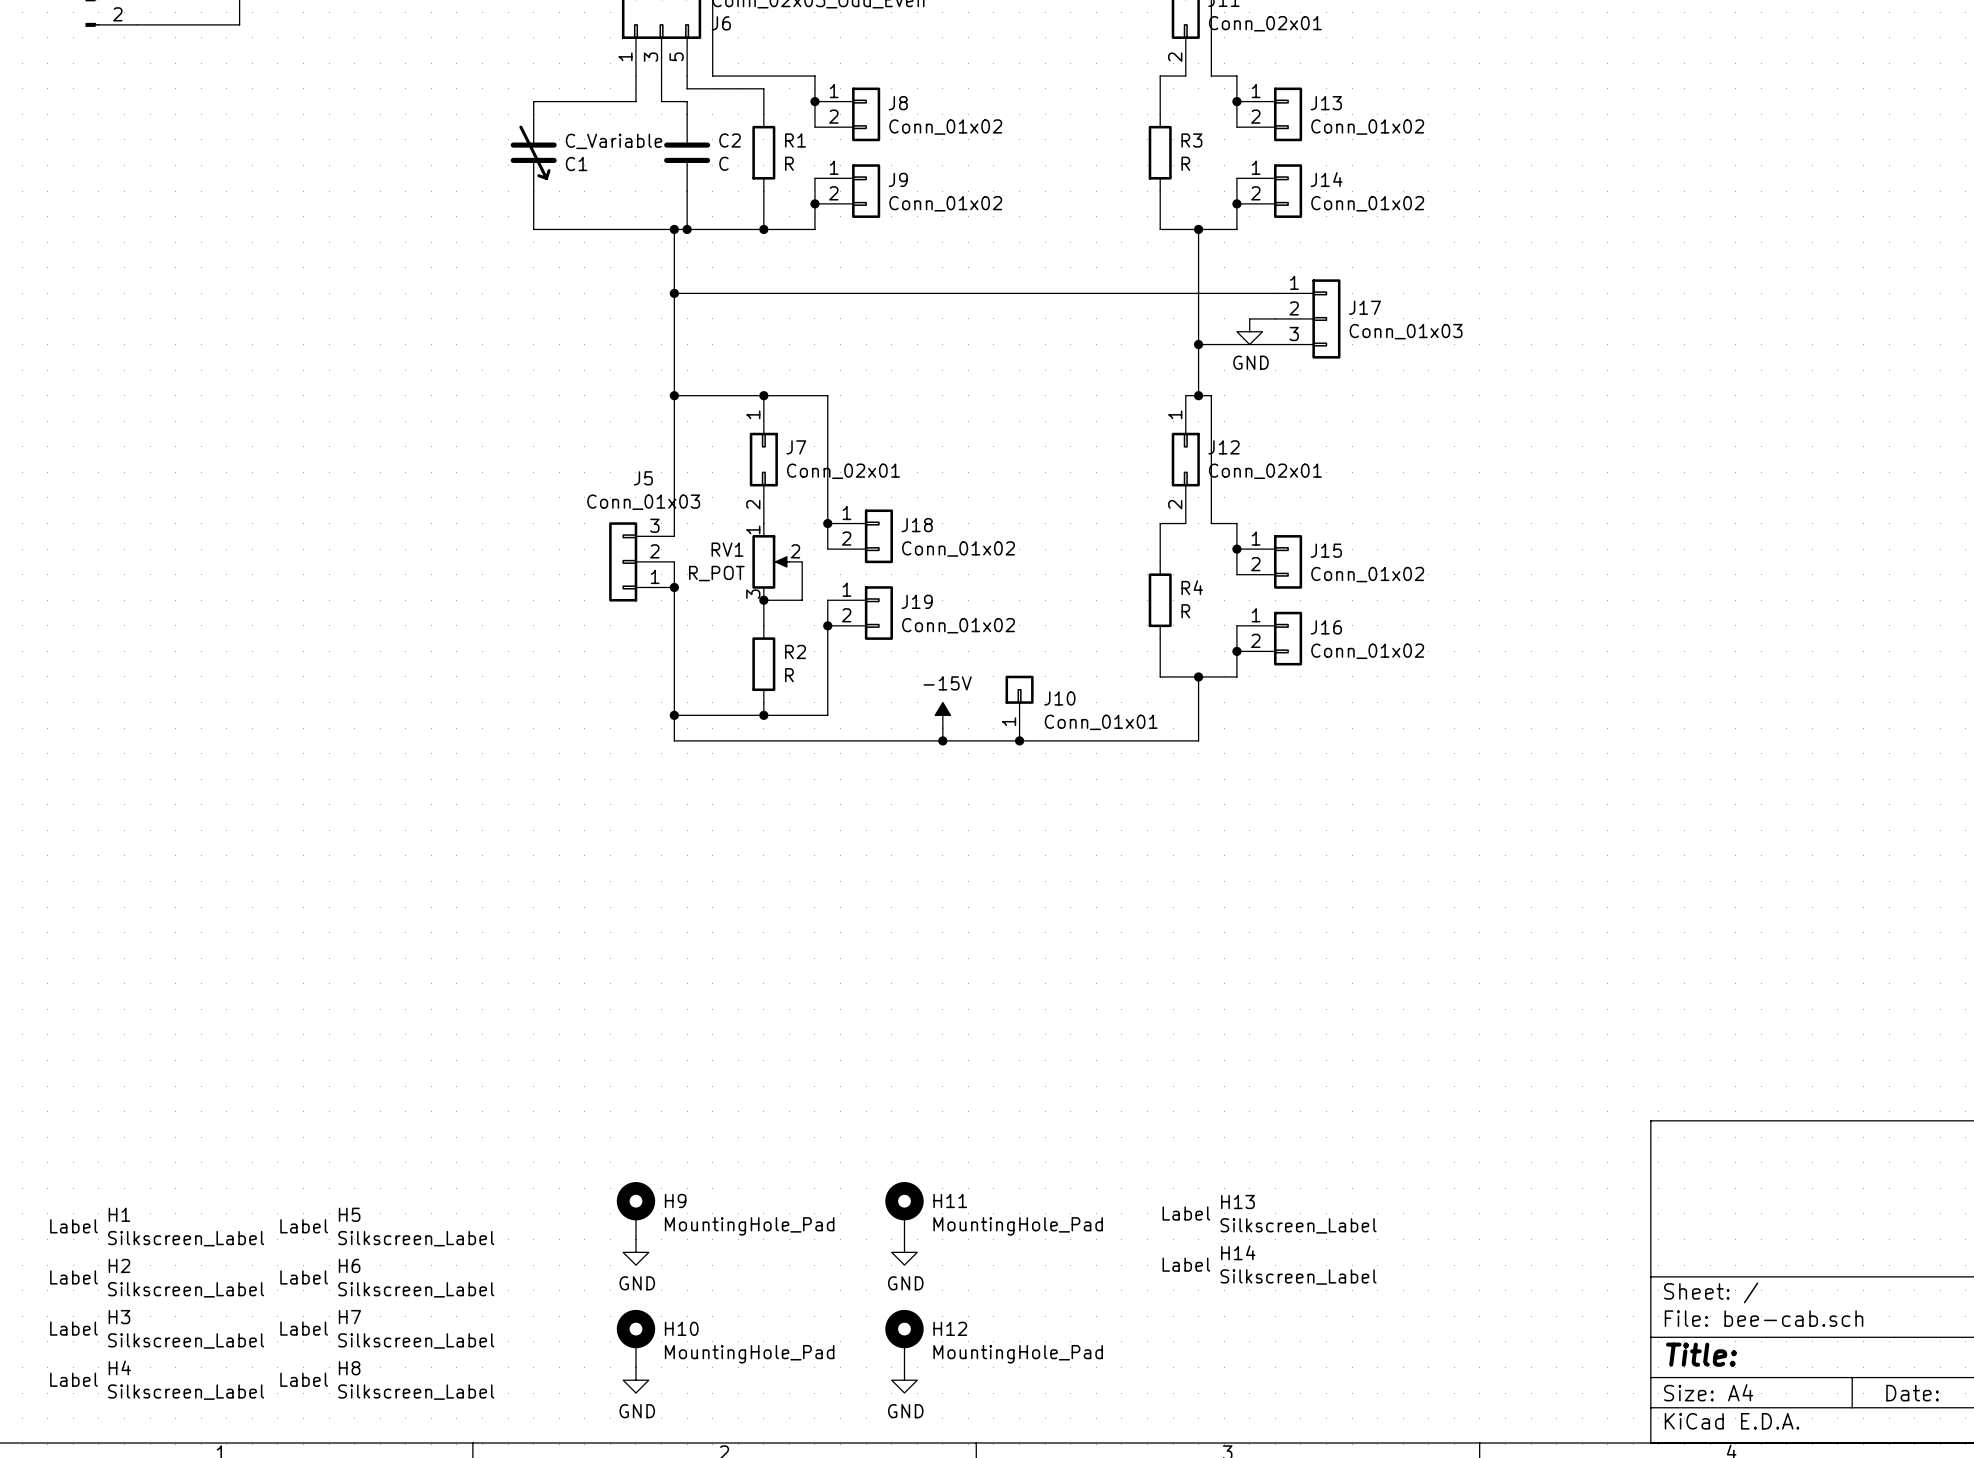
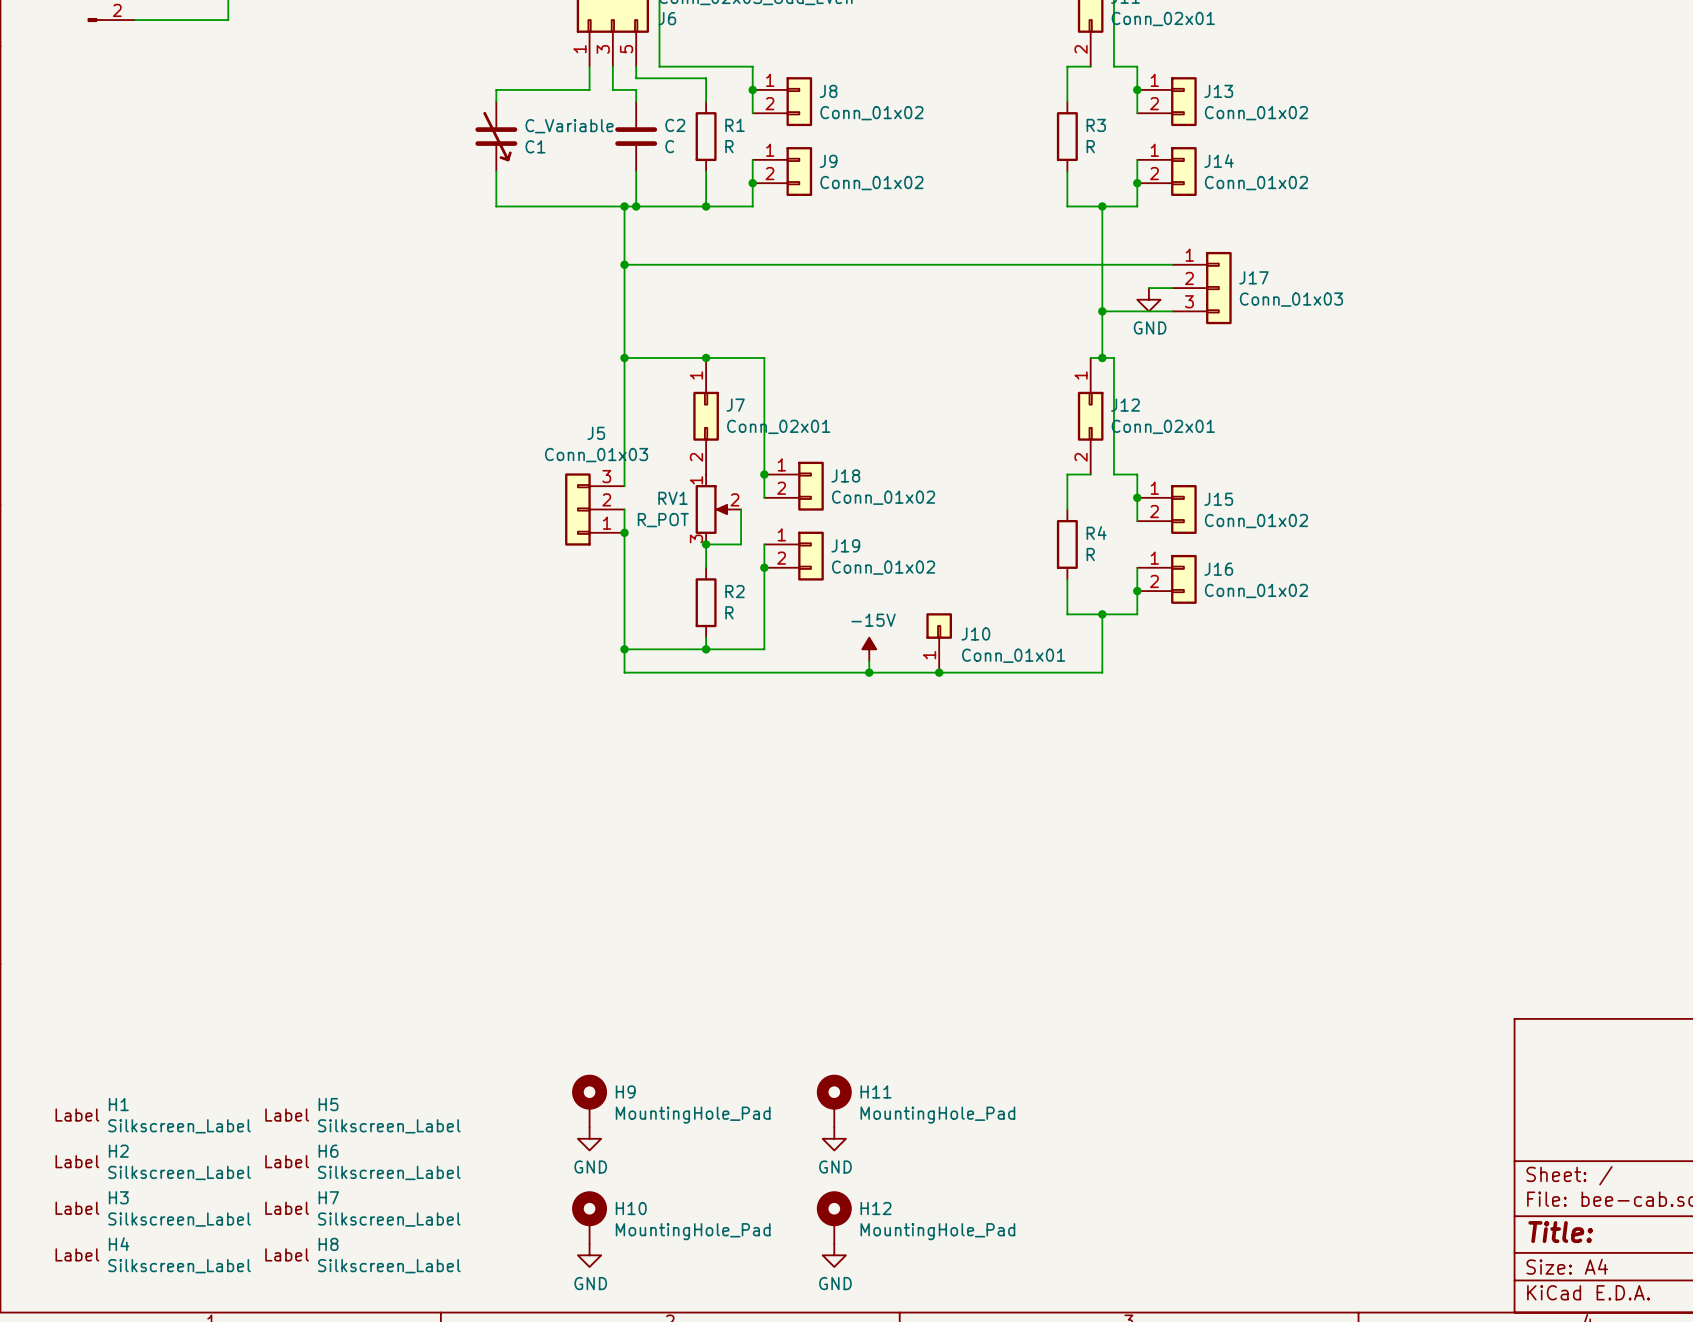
H13: Silkscreen_Label (1269, 1214) -> none
H14: Silkscreen_Label (1269, 1265) -> none

